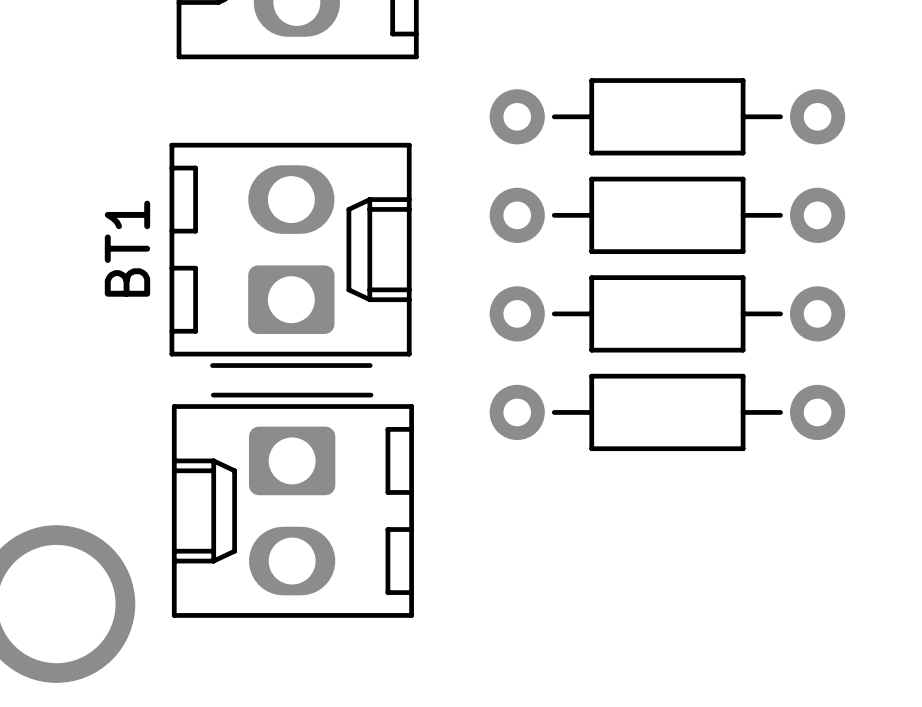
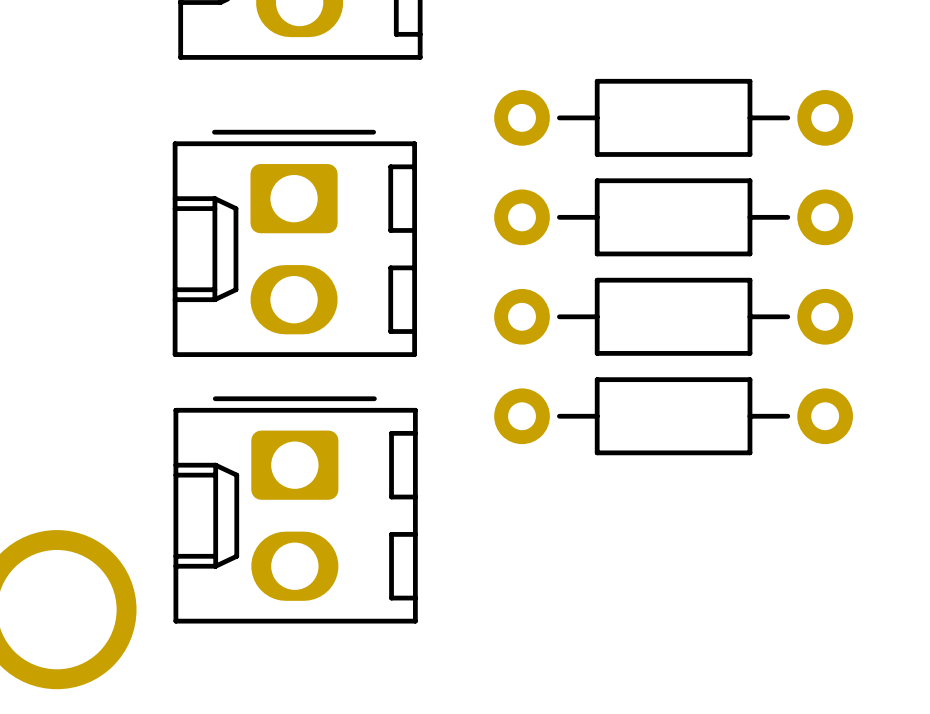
part: none -> (294, 243)
BT1: (290, 255) -> none

